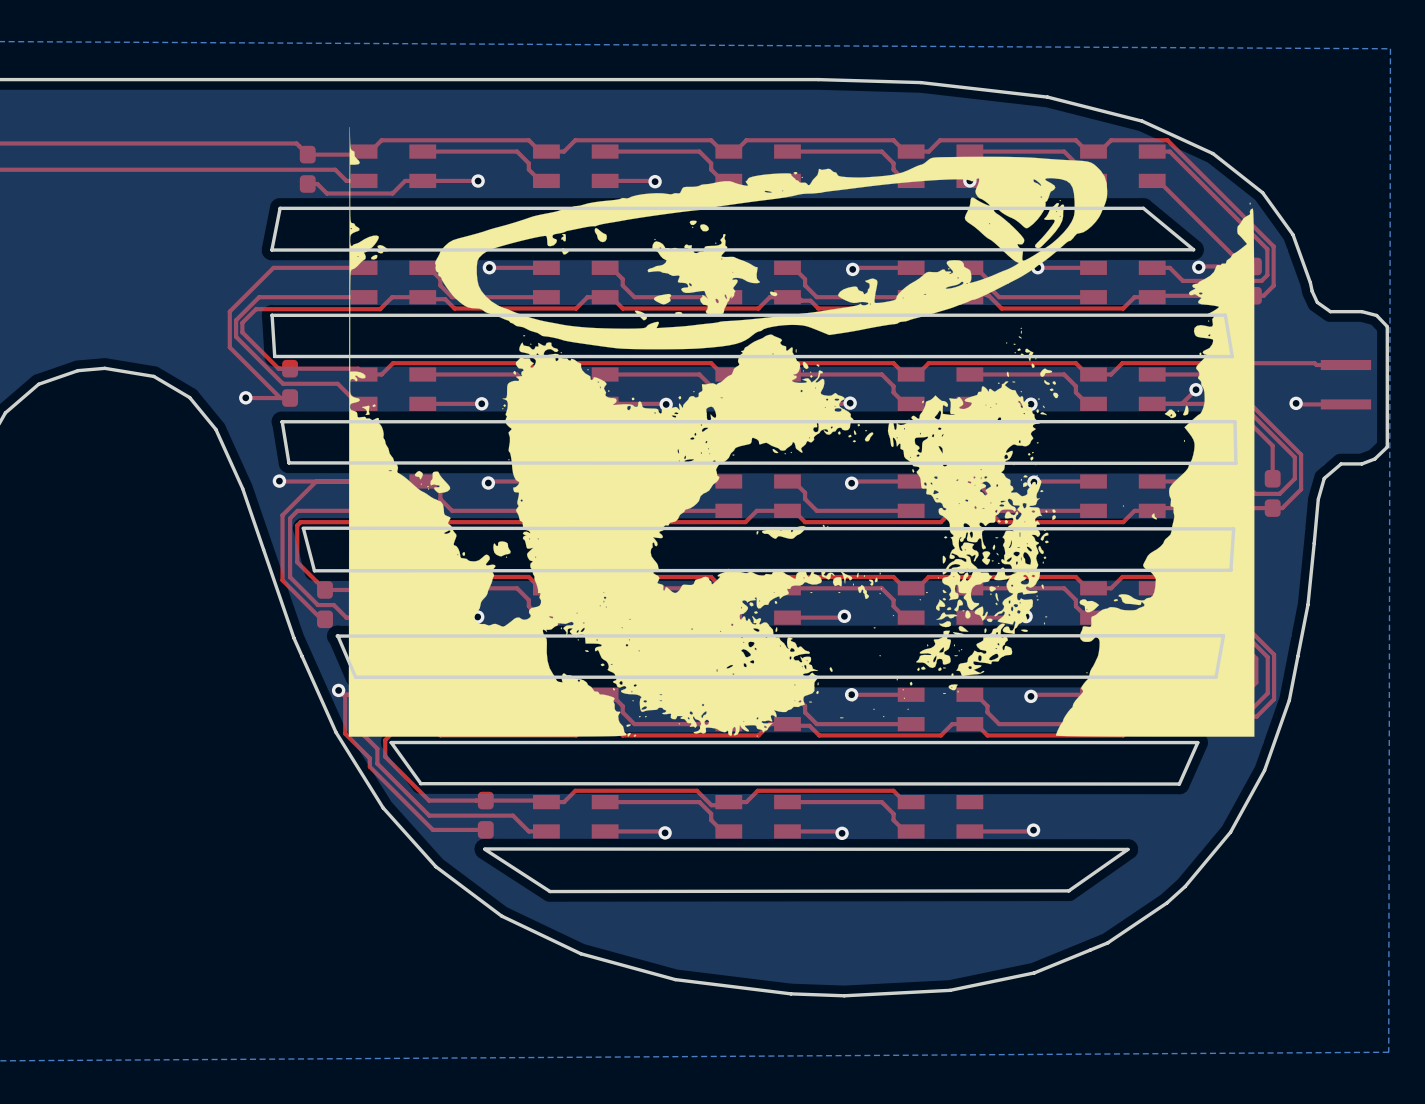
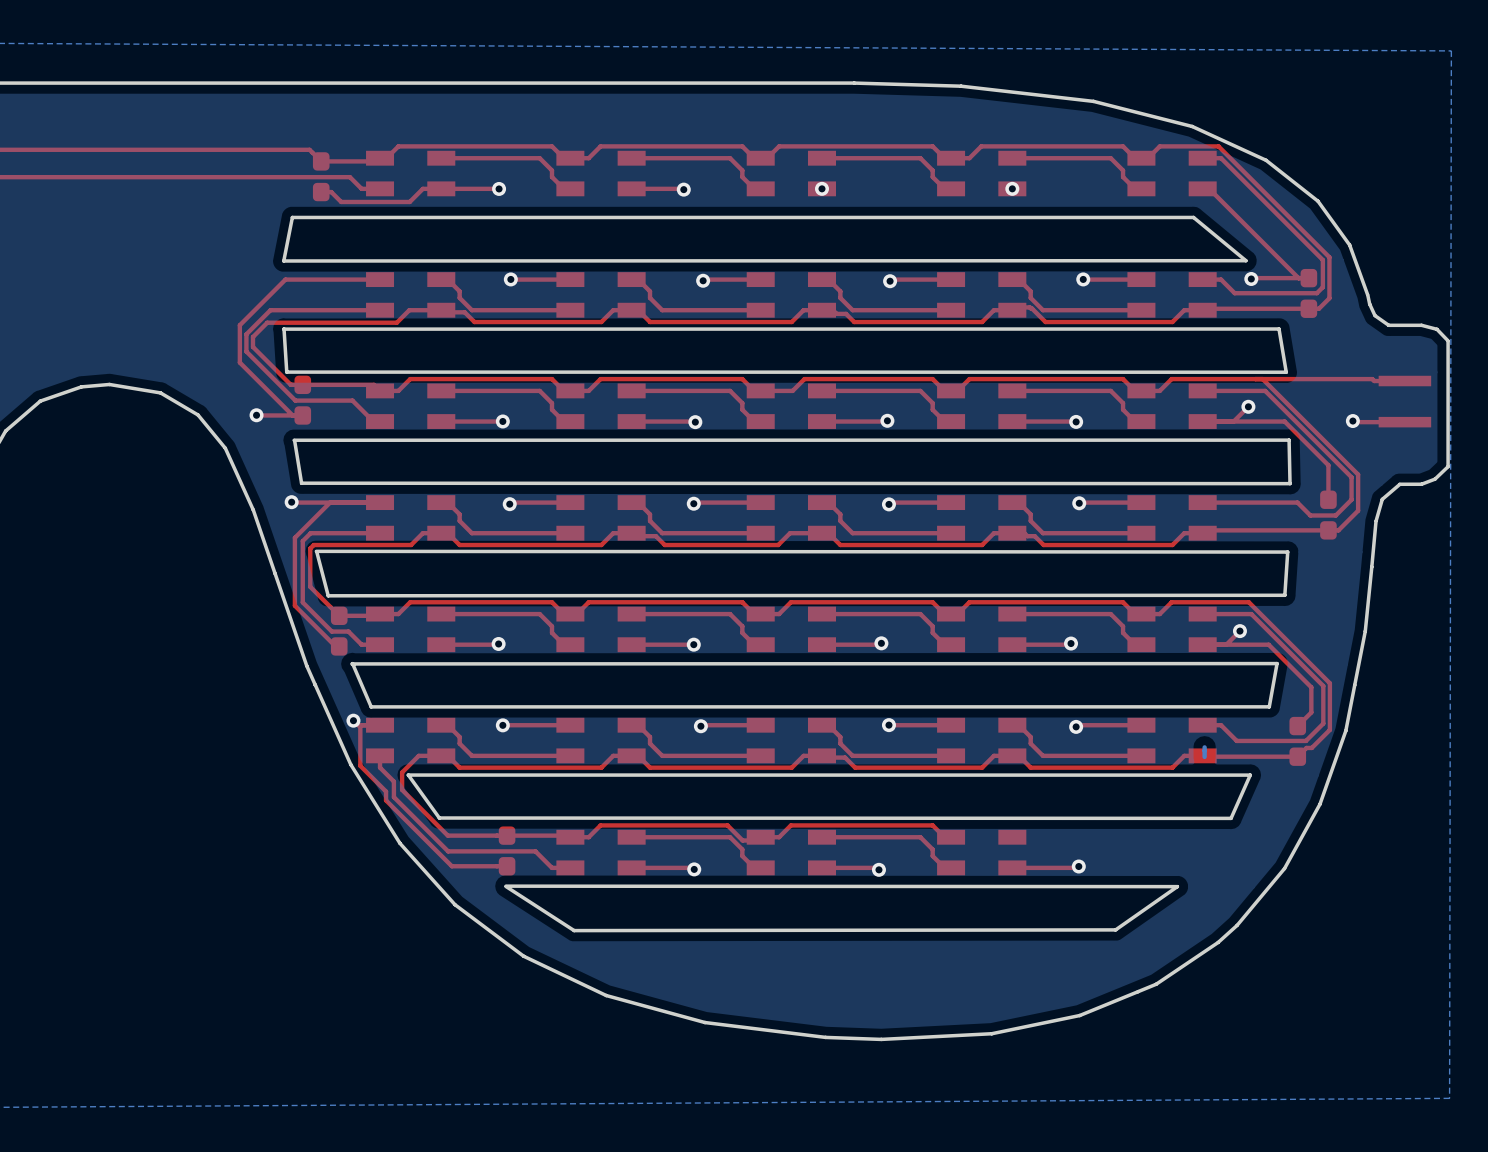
drawing: [348, 126, 1255, 737] -> none

